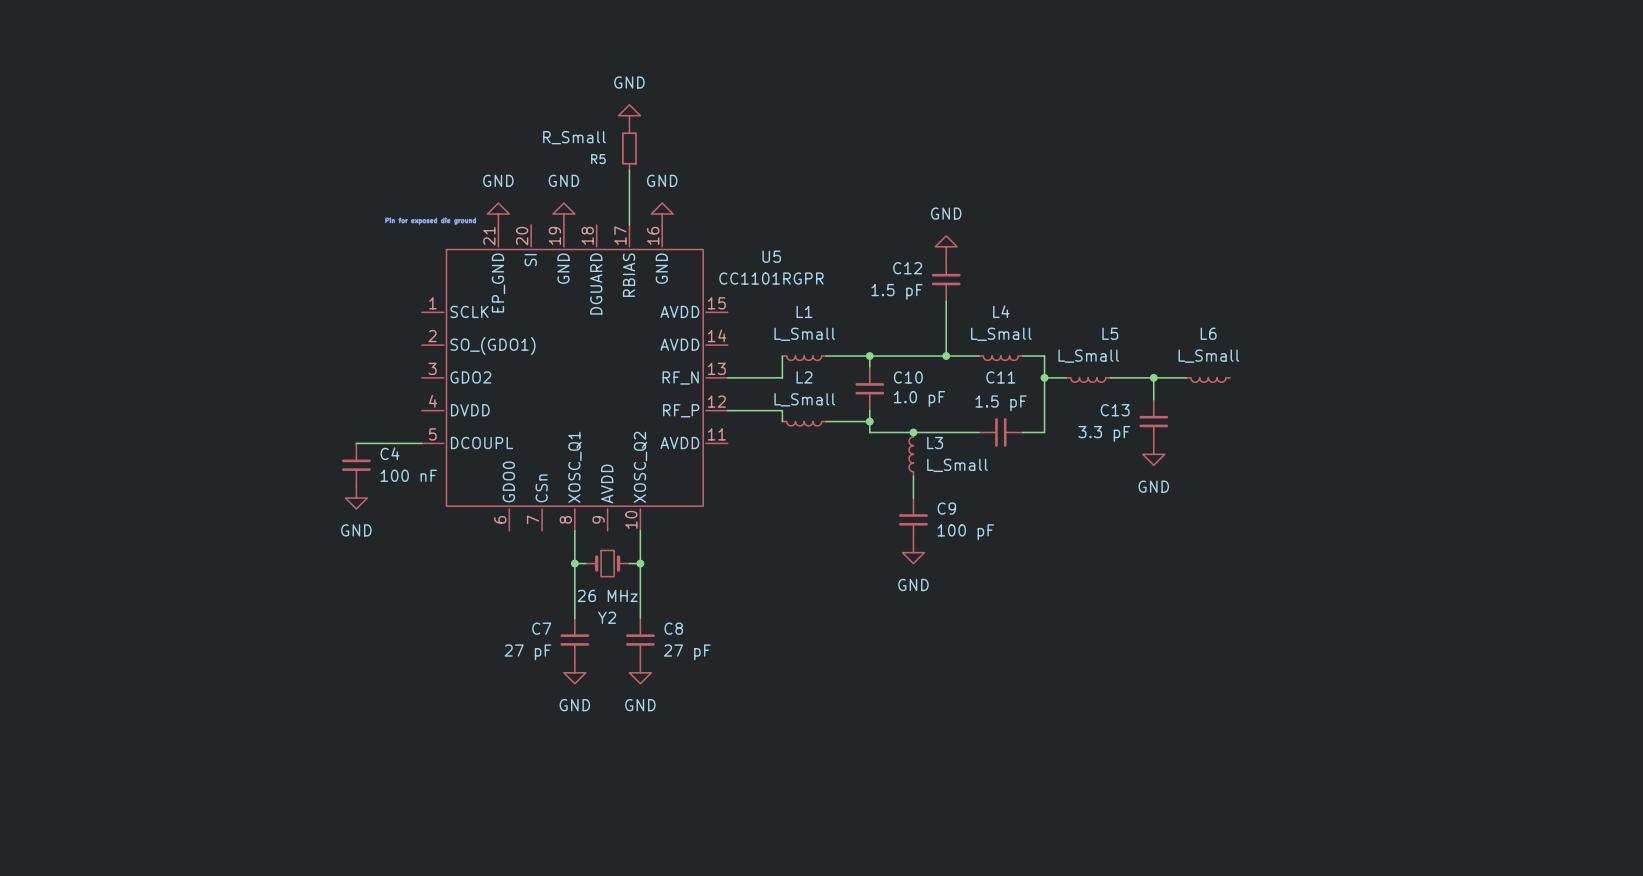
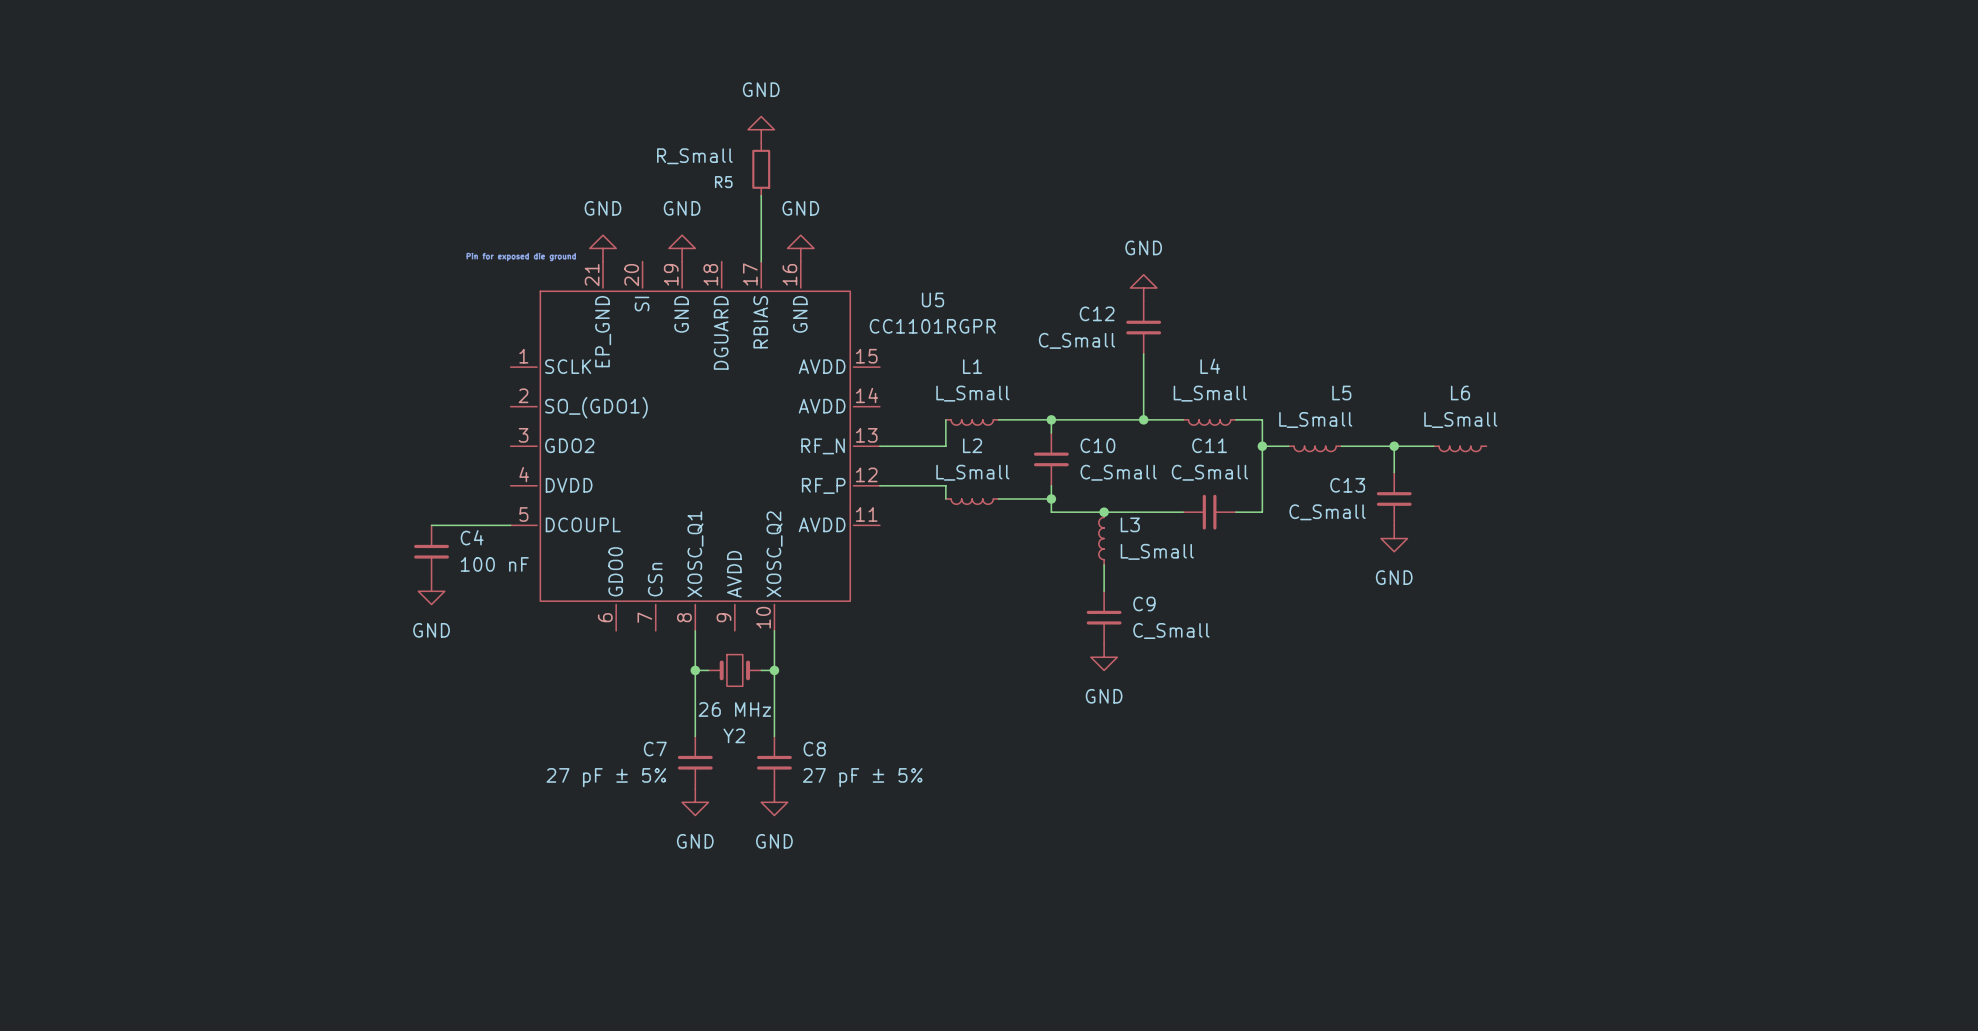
C12 value: 1.5 pF (896, 291) -> C_Small (1077, 340)
C10 value: 1.0 pF (919, 398) -> C_Small (1118, 472)
C11 value: 1.5 pF (1001, 403) -> C_Small (1209, 472)
C13 value: 3.3 pF (1104, 433) -> C_Small (1327, 512)
C9 value: 100 pF (965, 532) -> C_Small (1171, 631)
C7 value: 27 pF (527, 652) -> 27 pF ± 5% (606, 777)
C8 value: 27 pF (687, 652) -> 27 pF ± 5% (862, 777)

